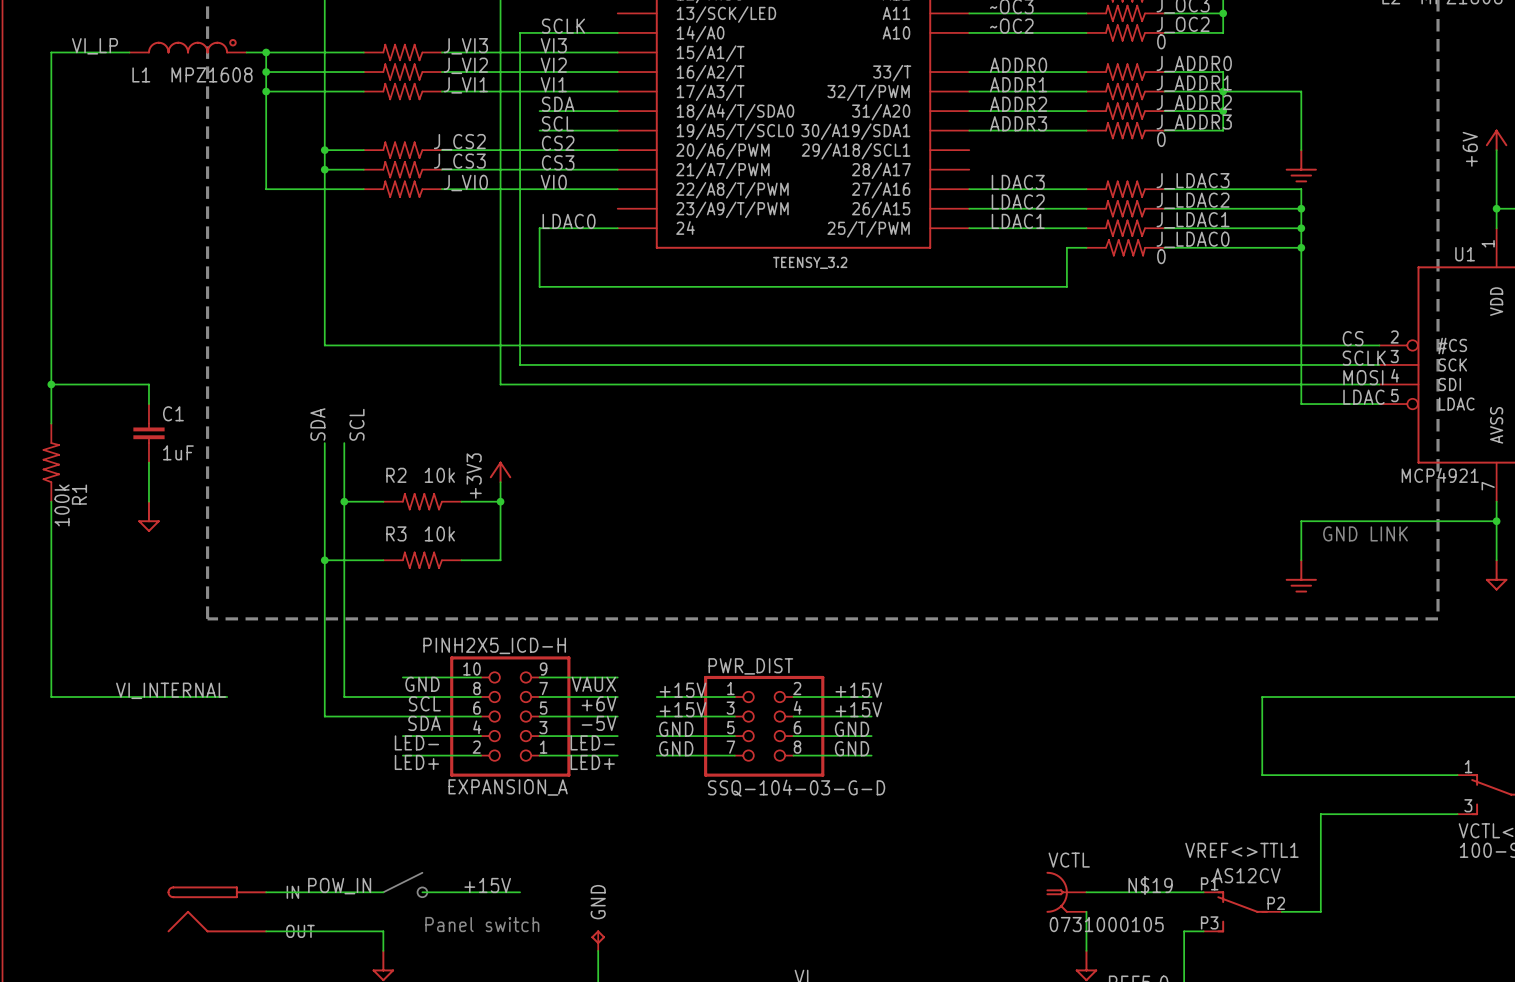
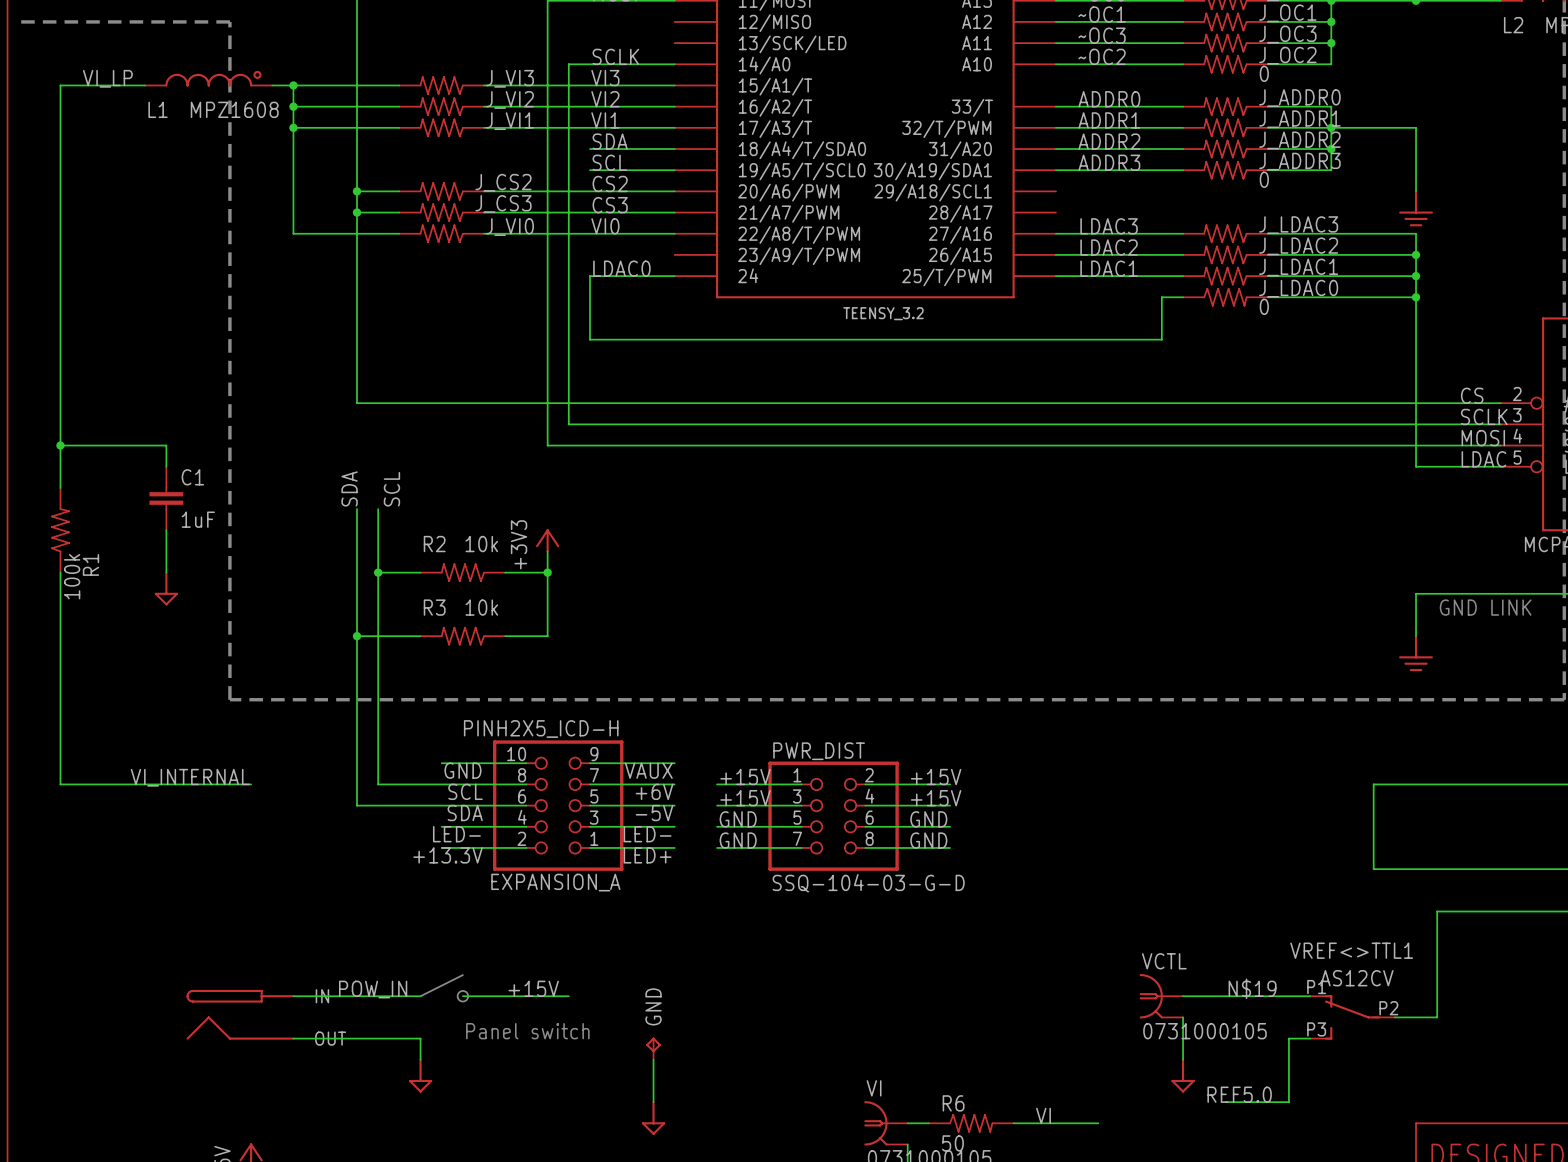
label: LED+ (416, 762) -> +13.3V (448, 855)

